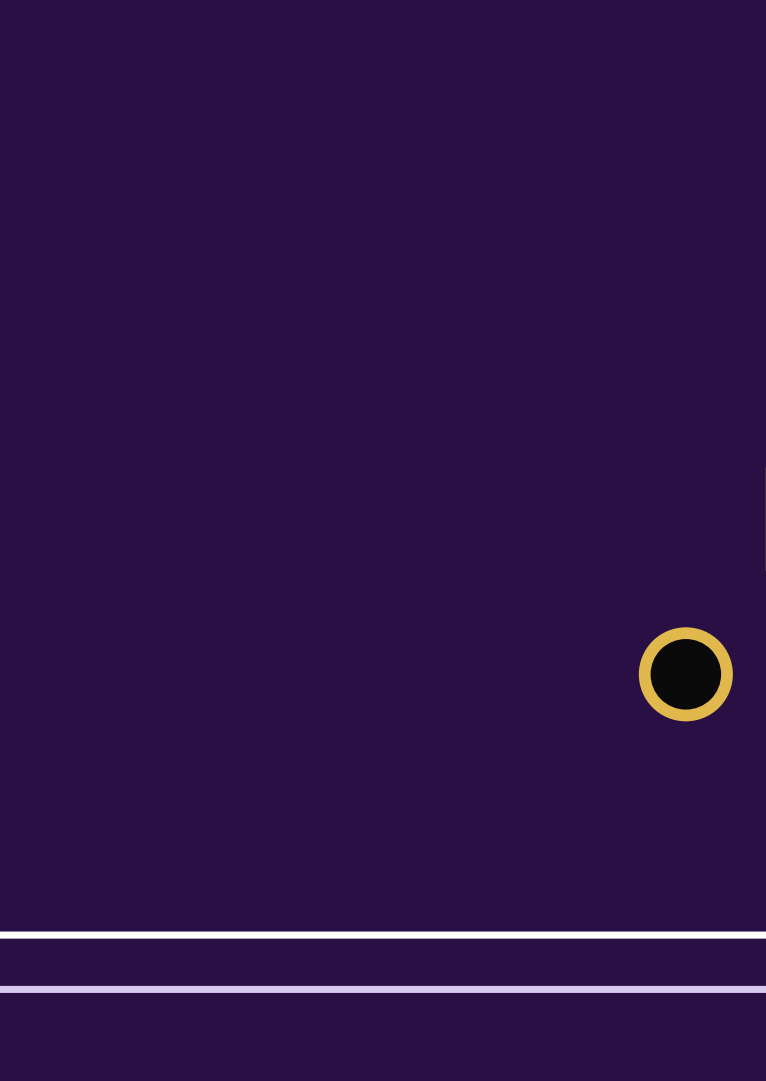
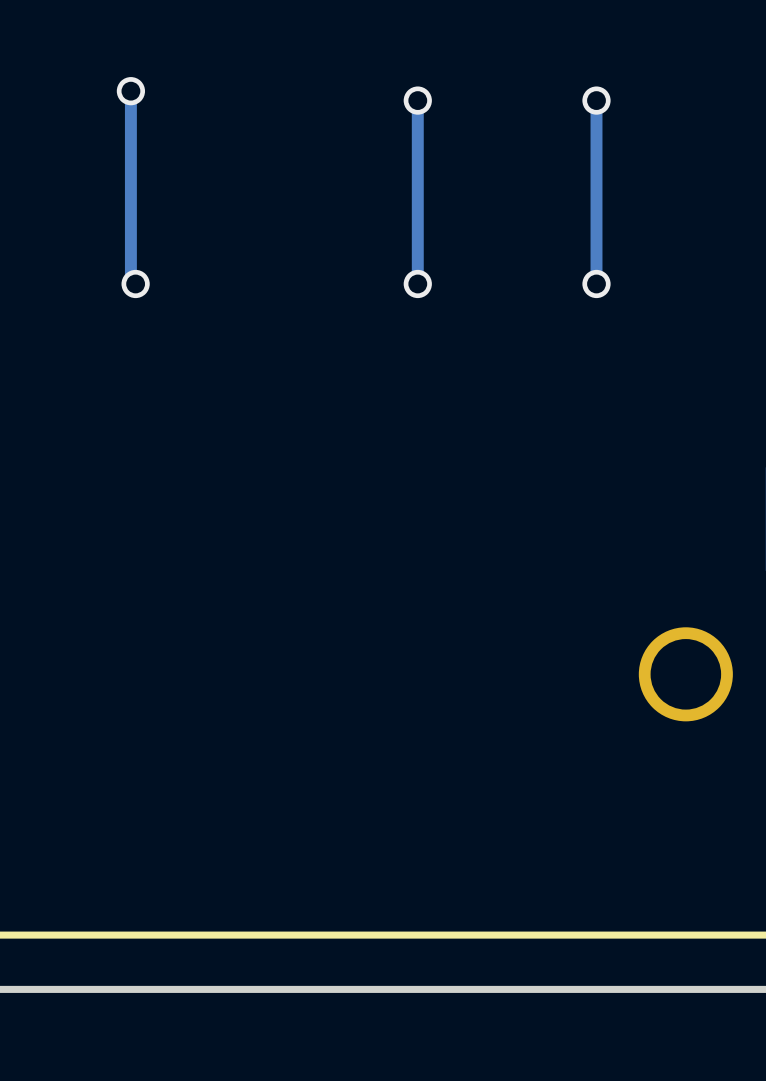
track: none -> (130, 91) (130, 279) (135, 283)
via: none -> (130, 91)
track: none -> (417, 100) (417, 283)
via: none -> (417, 100)
track: none -> (596, 100) (596, 283)
via: none -> (596, 100)
via: none -> (135, 283)
via: none -> (417, 283)
via: none -> (596, 283)

